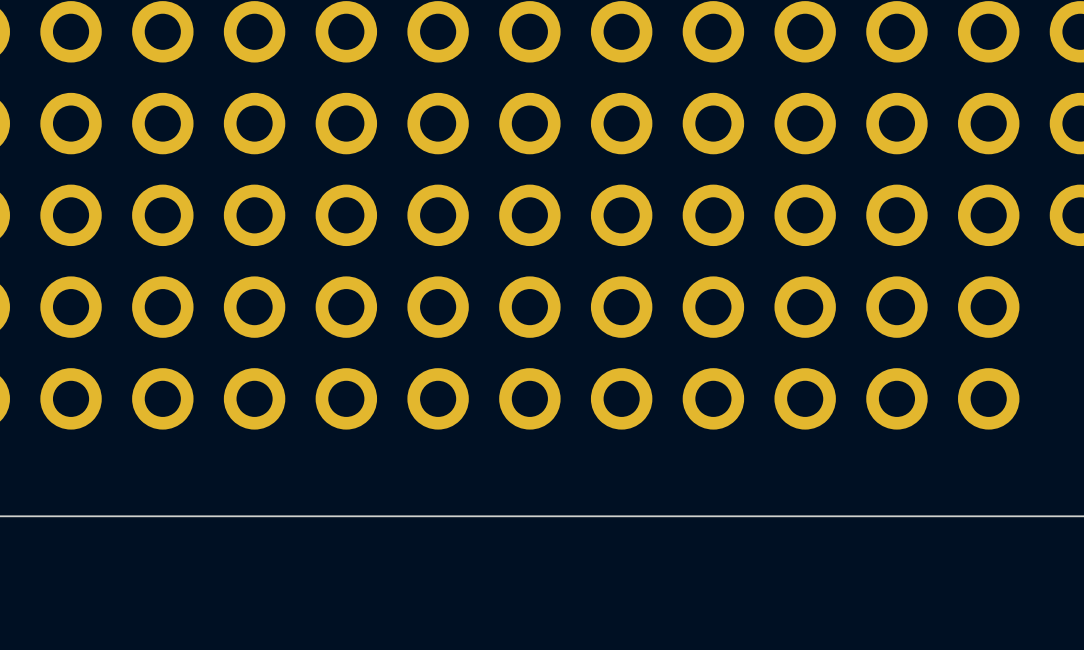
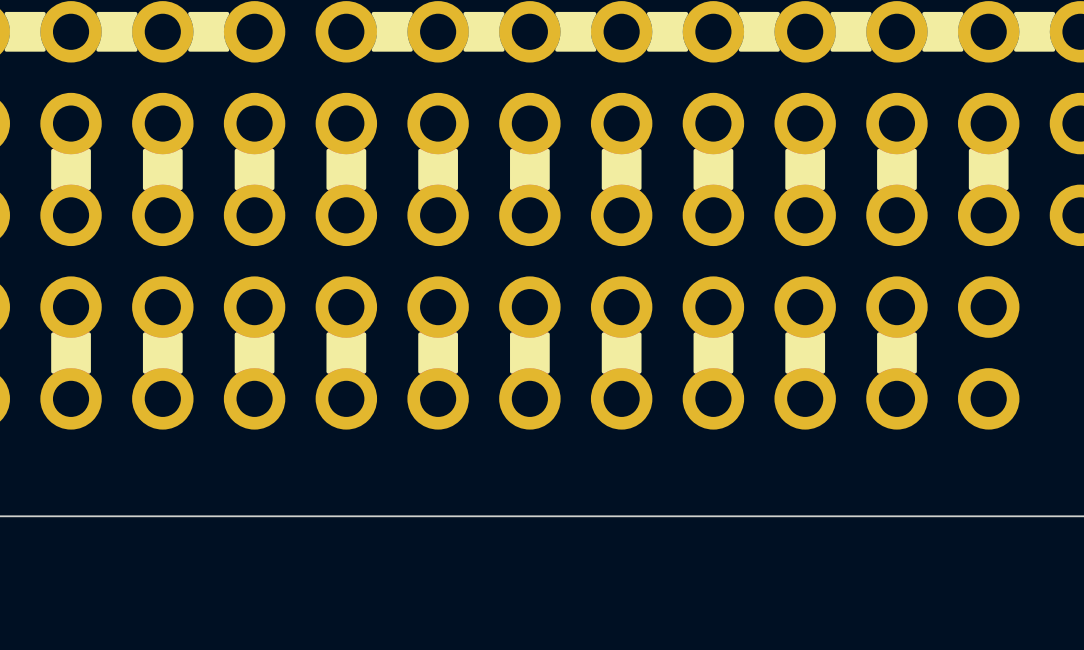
drawing: none -> [4, 11, 46, 52]
drawing: none -> [96, 11, 138, 52]
drawing: none -> [188, 11, 230, 52]
drawing: none -> [371, 11, 413, 52]
drawing: none -> [463, 11, 505, 52]
drawing: none -> [555, 11, 597, 52]
drawing: none -> [646, 11, 689, 52]
drawing: none -> [738, 11, 780, 52]
drawing: none -> [830, 11, 872, 52]
drawing: none -> [922, 11, 964, 52]
drawing: none -> [1014, 11, 1056, 52]
drawing: none -> [51, 148, 91, 191]
drawing: none -> [142, 148, 183, 191]
drawing: none -> [234, 148, 275, 191]
drawing: none -> [326, 148, 367, 191]
drawing: none -> [418, 148, 458, 191]
drawing: none -> [510, 148, 550, 191]
drawing: none -> [601, 148, 642, 191]
drawing: none -> [693, 148, 734, 191]
drawing: none -> [785, 148, 826, 191]
drawing: none -> [877, 148, 917, 191]
drawing: none -> [968, 148, 1009, 191]
drawing: none -> [51, 332, 91, 374]
drawing: none -> [142, 332, 183, 374]
drawing: none -> [234, 332, 275, 374]
drawing: none -> [326, 332, 367, 374]
drawing: none -> [418, 332, 458, 374]
drawing: none -> [510, 332, 550, 374]
drawing: none -> [601, 332, 642, 374]
drawing: none -> [693, 332, 734, 374]
drawing: none -> [785, 332, 826, 374]
drawing: none -> [877, 332, 917, 374]

